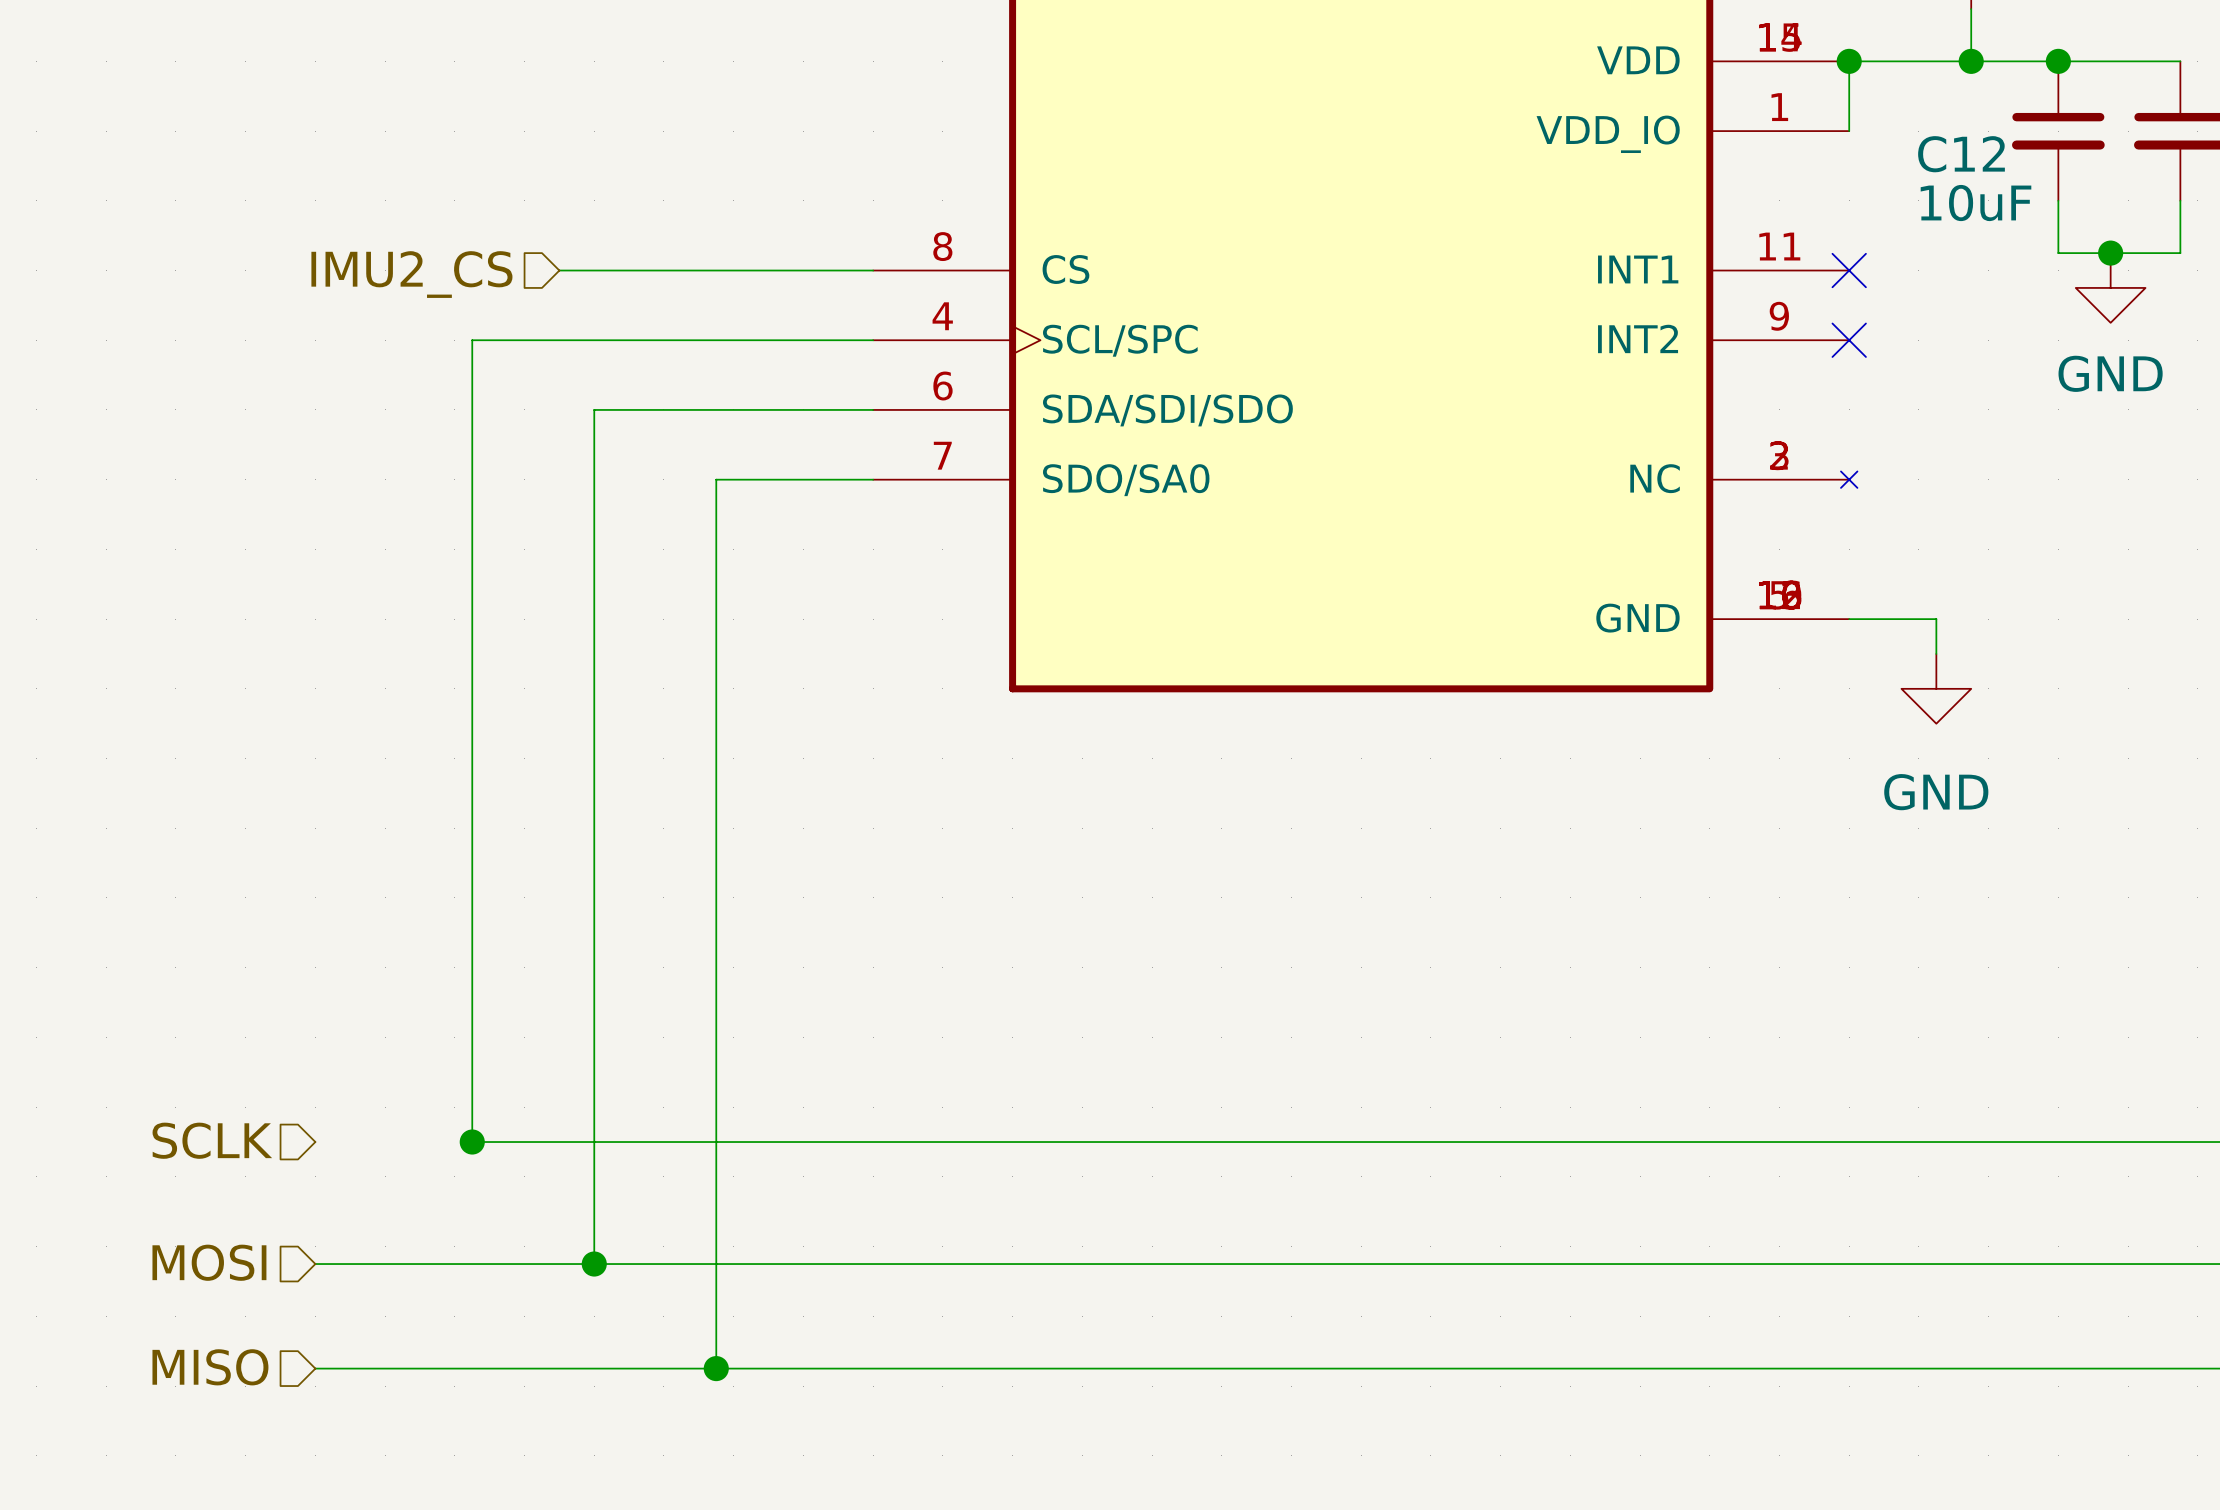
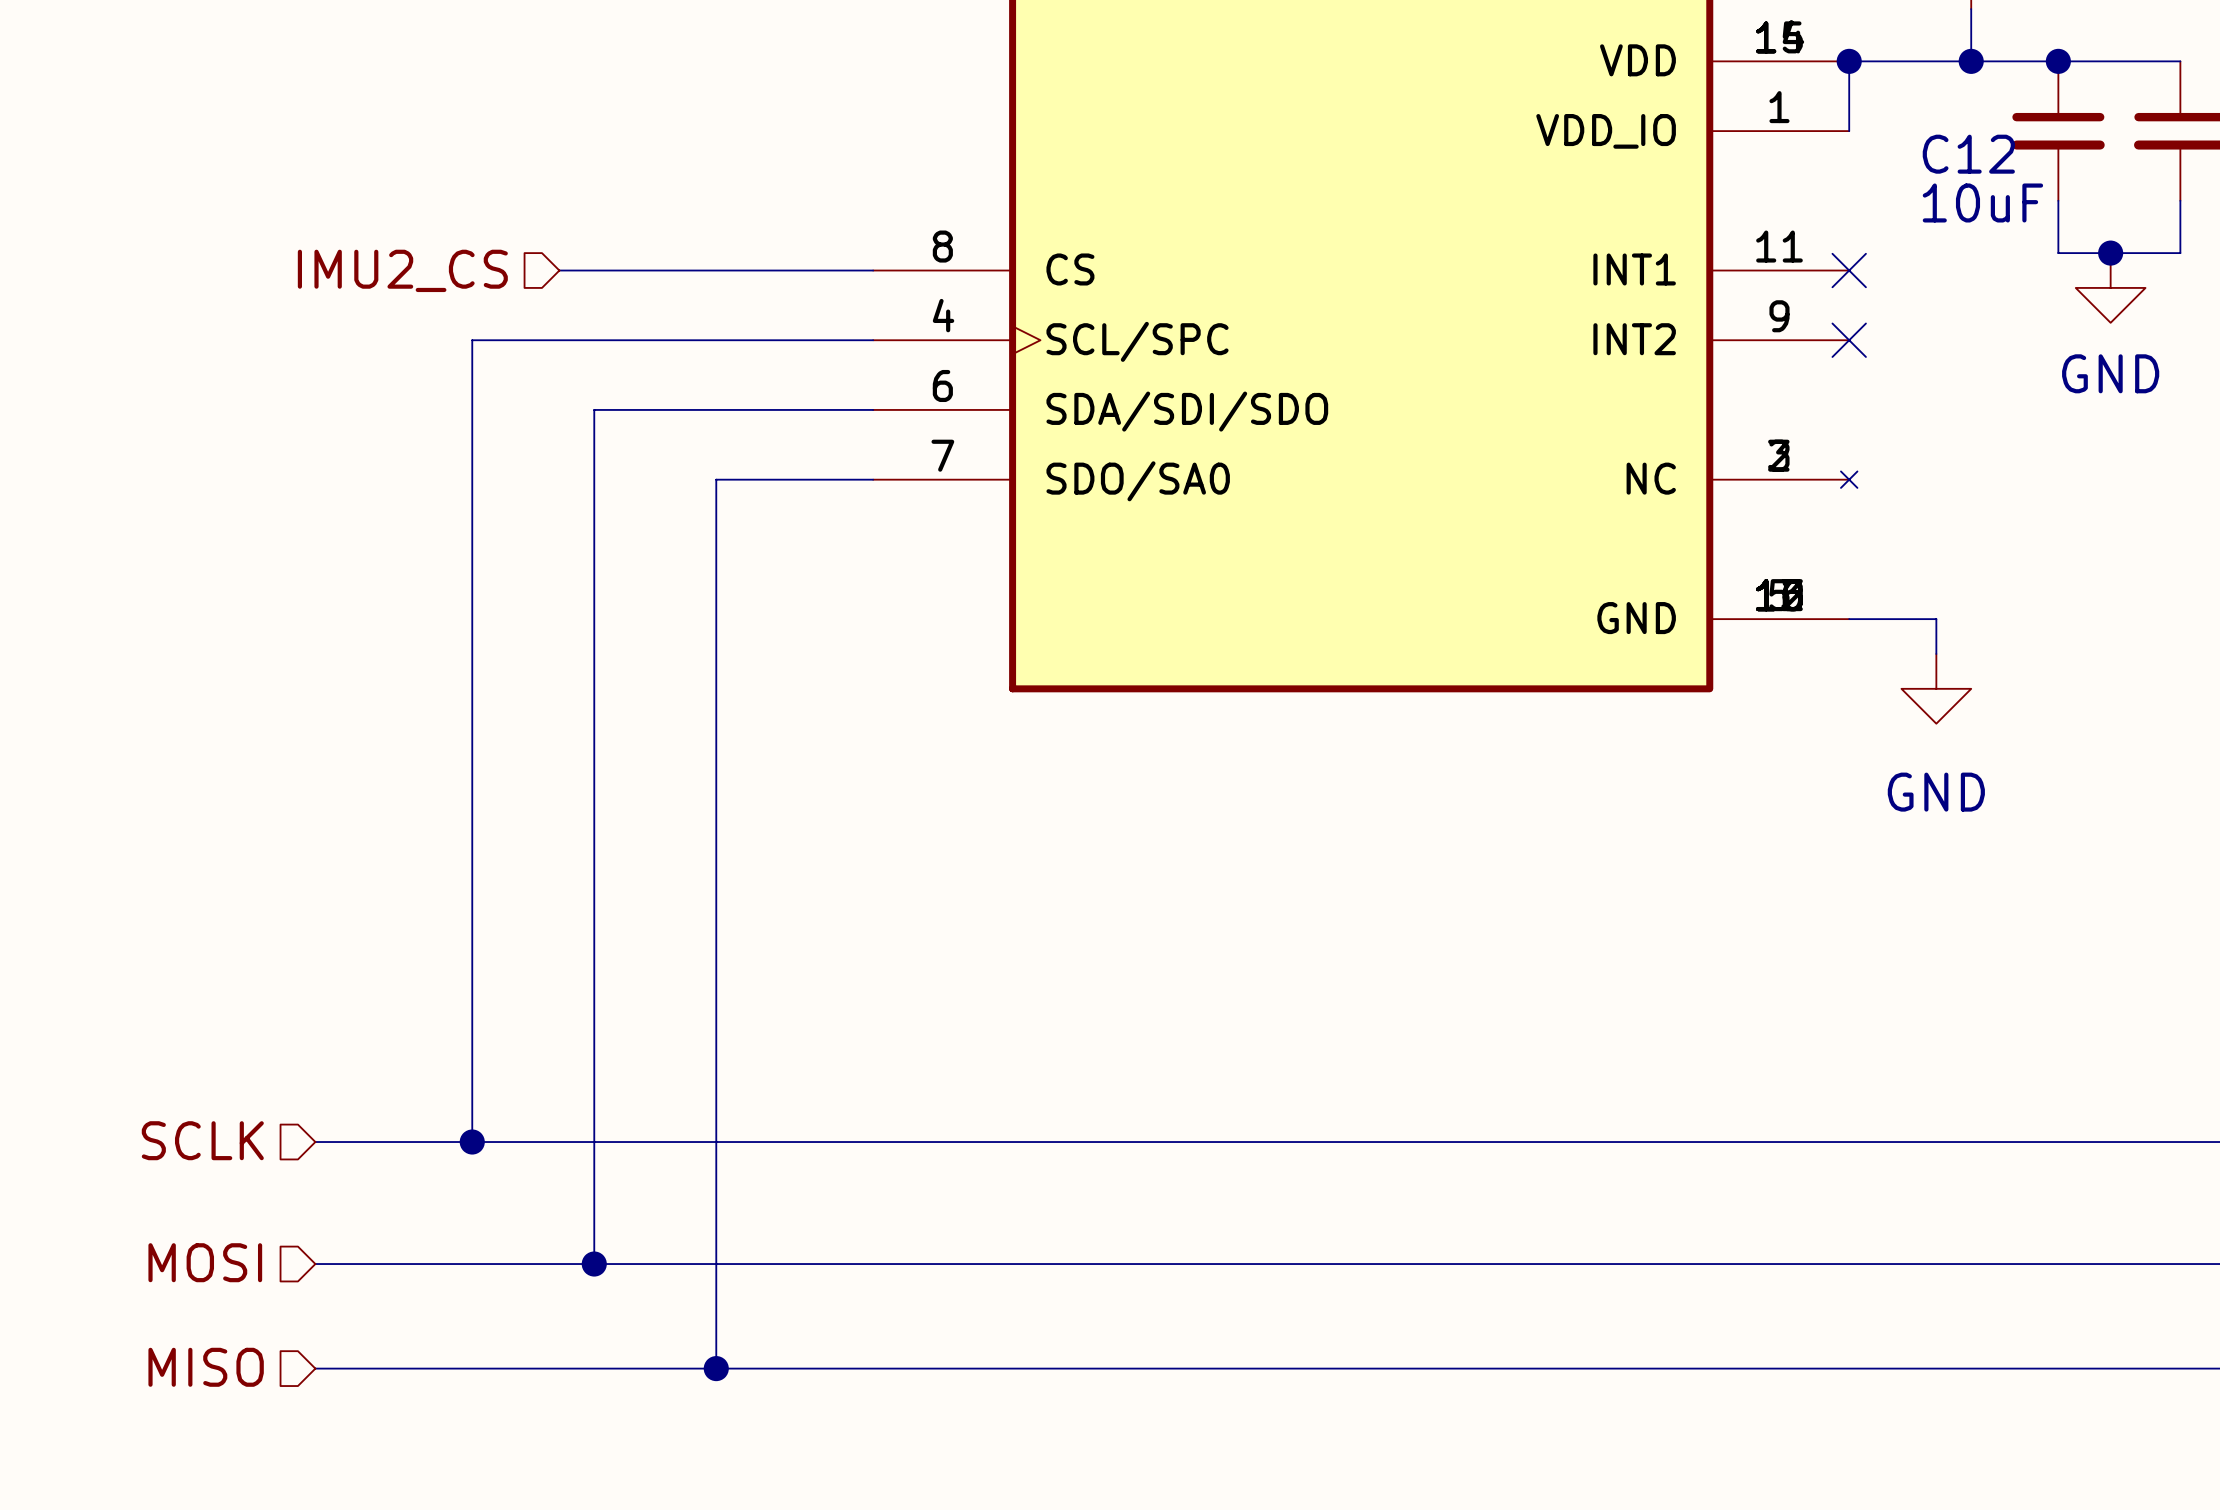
wire: none -> (315, 1142) (472, 1142)

